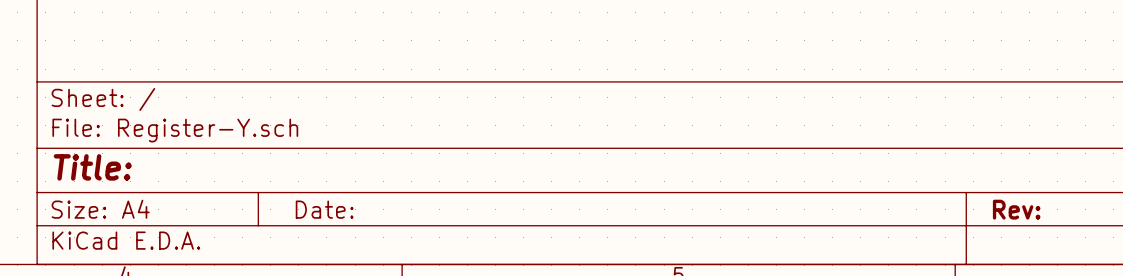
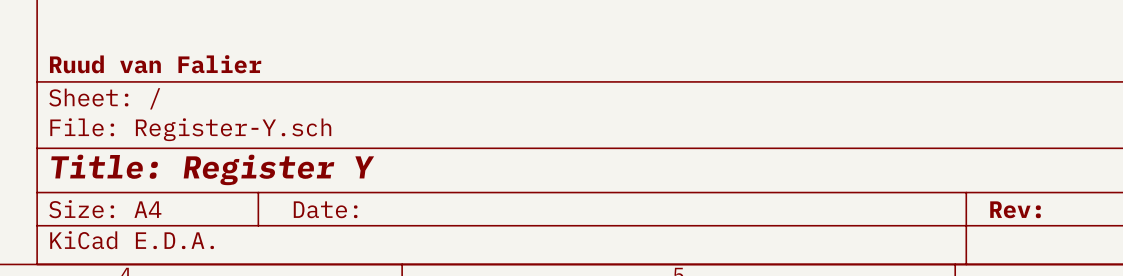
title block: none -> Ruud van Falier (155, 64)
title block: Title: (92, 167) -> Title: Register Y (212, 169)

